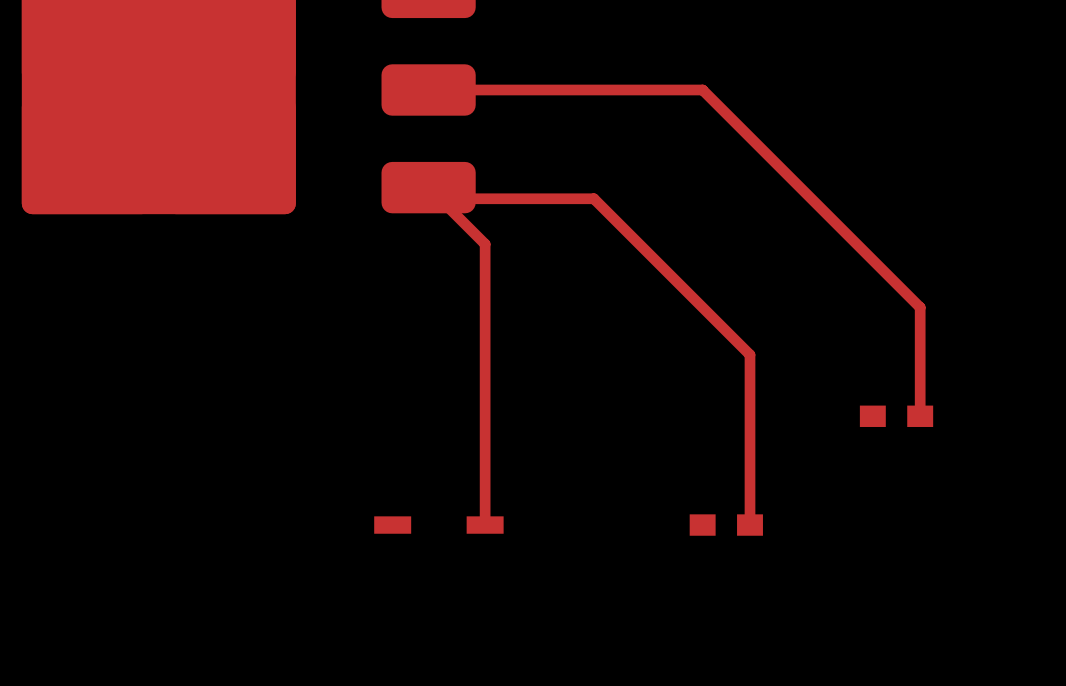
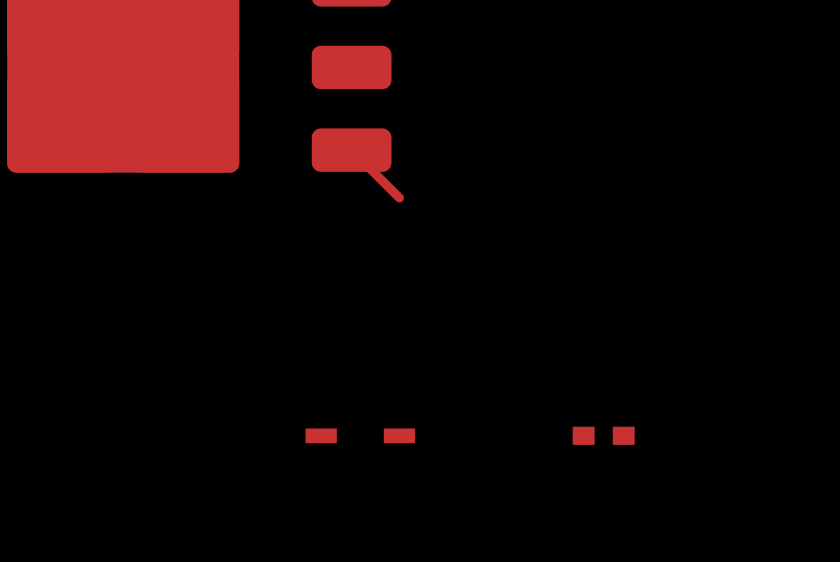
top track: (428, 89) (702, 89) (920, 307) (920, 416) -> none
top track: (439, 198) (593, 198) (750, 354) (750, 525) -> none
top track: (485, 244) (485, 525) -> none
part: (896, 416) -> none

